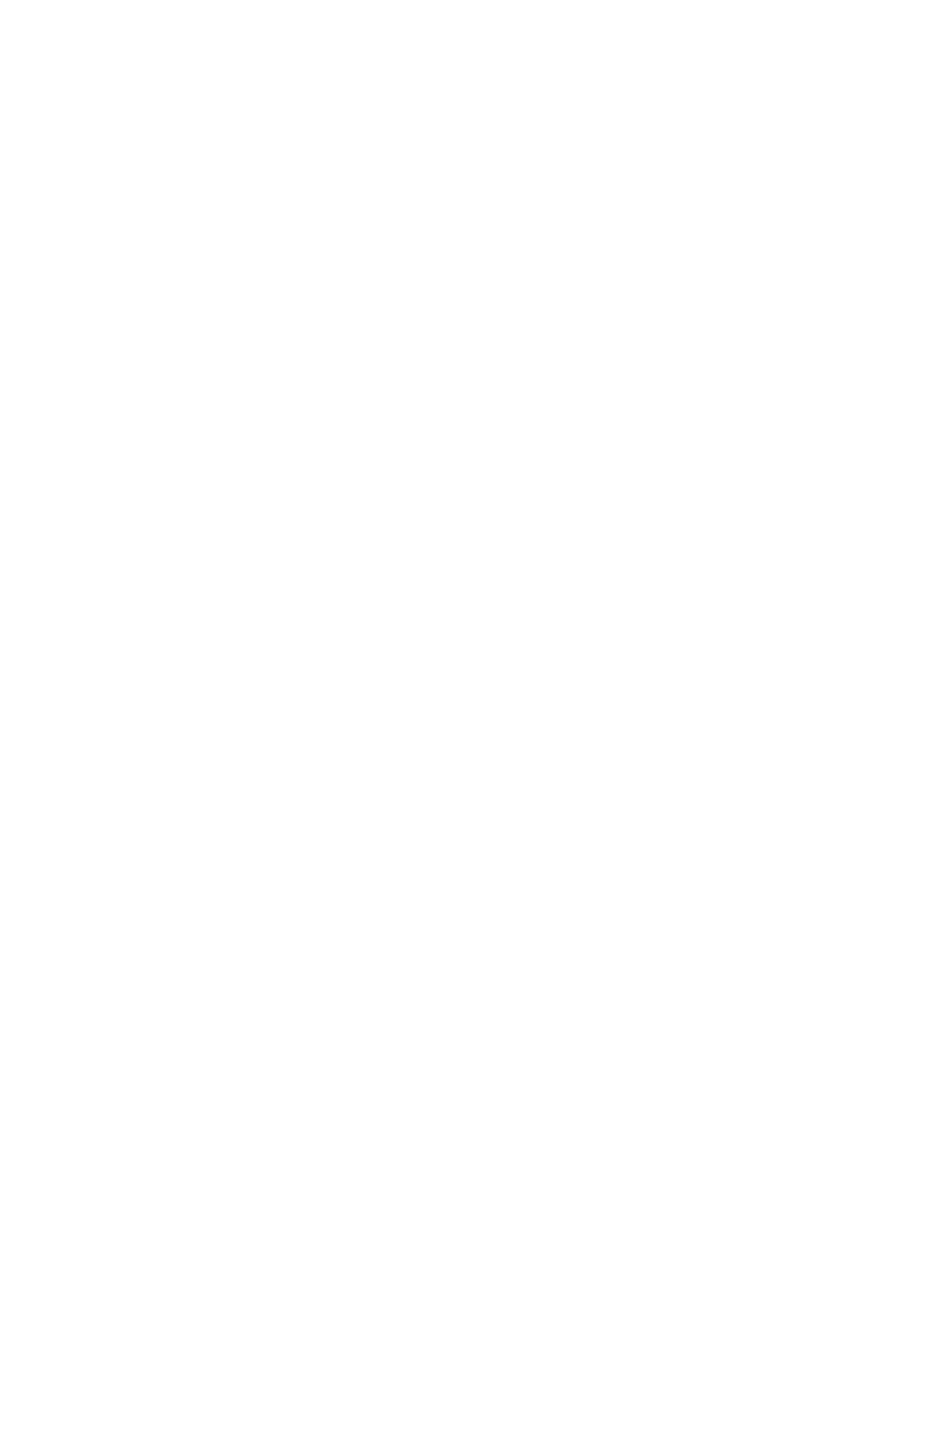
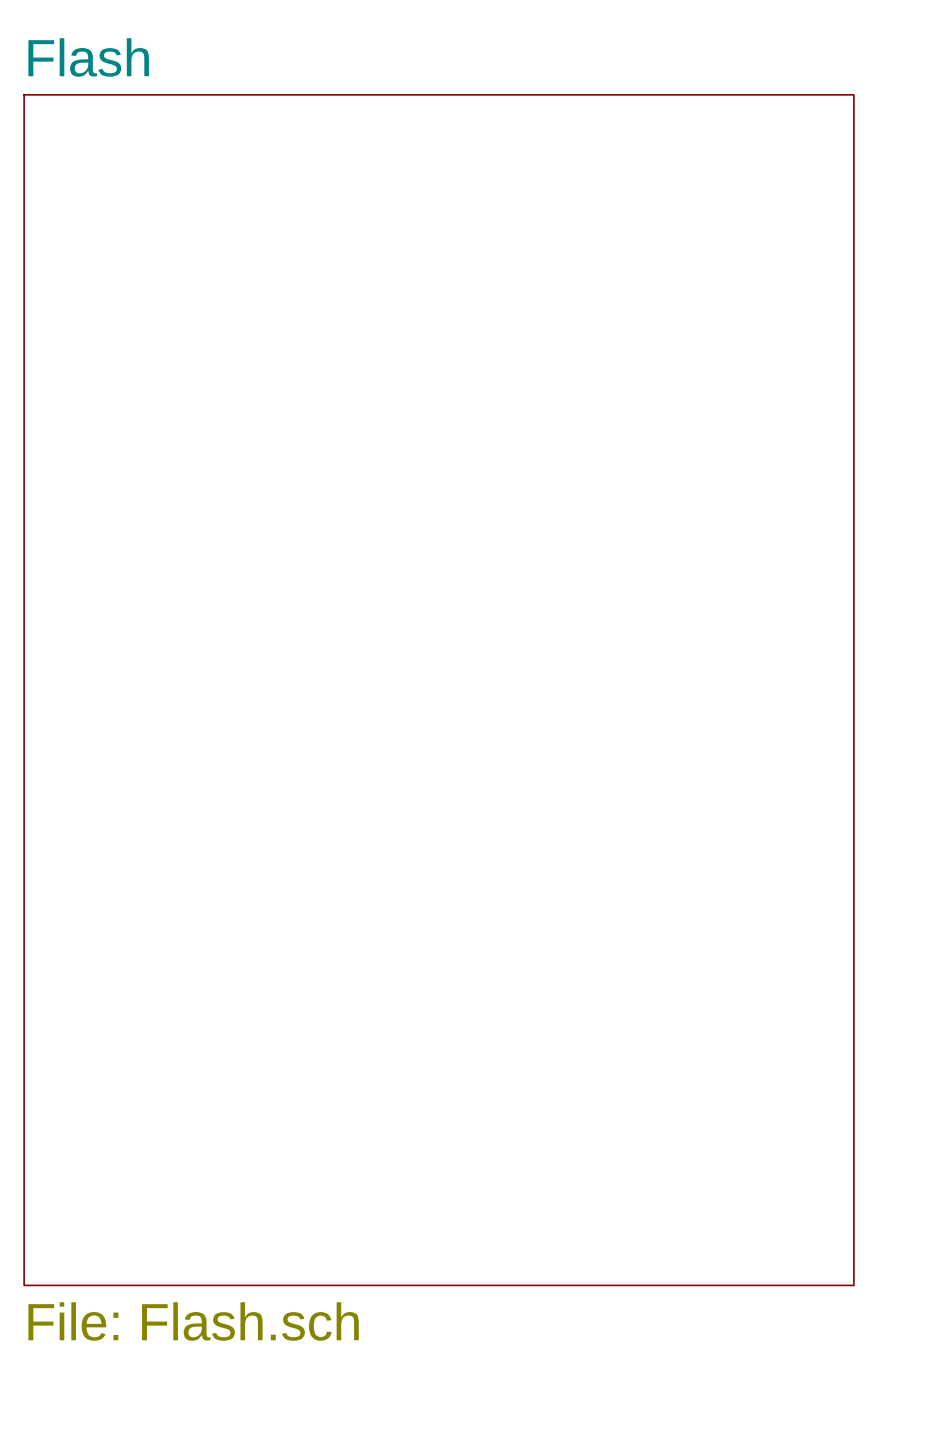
sheet Flash: none -> File: Flash.sch (439, 690)

